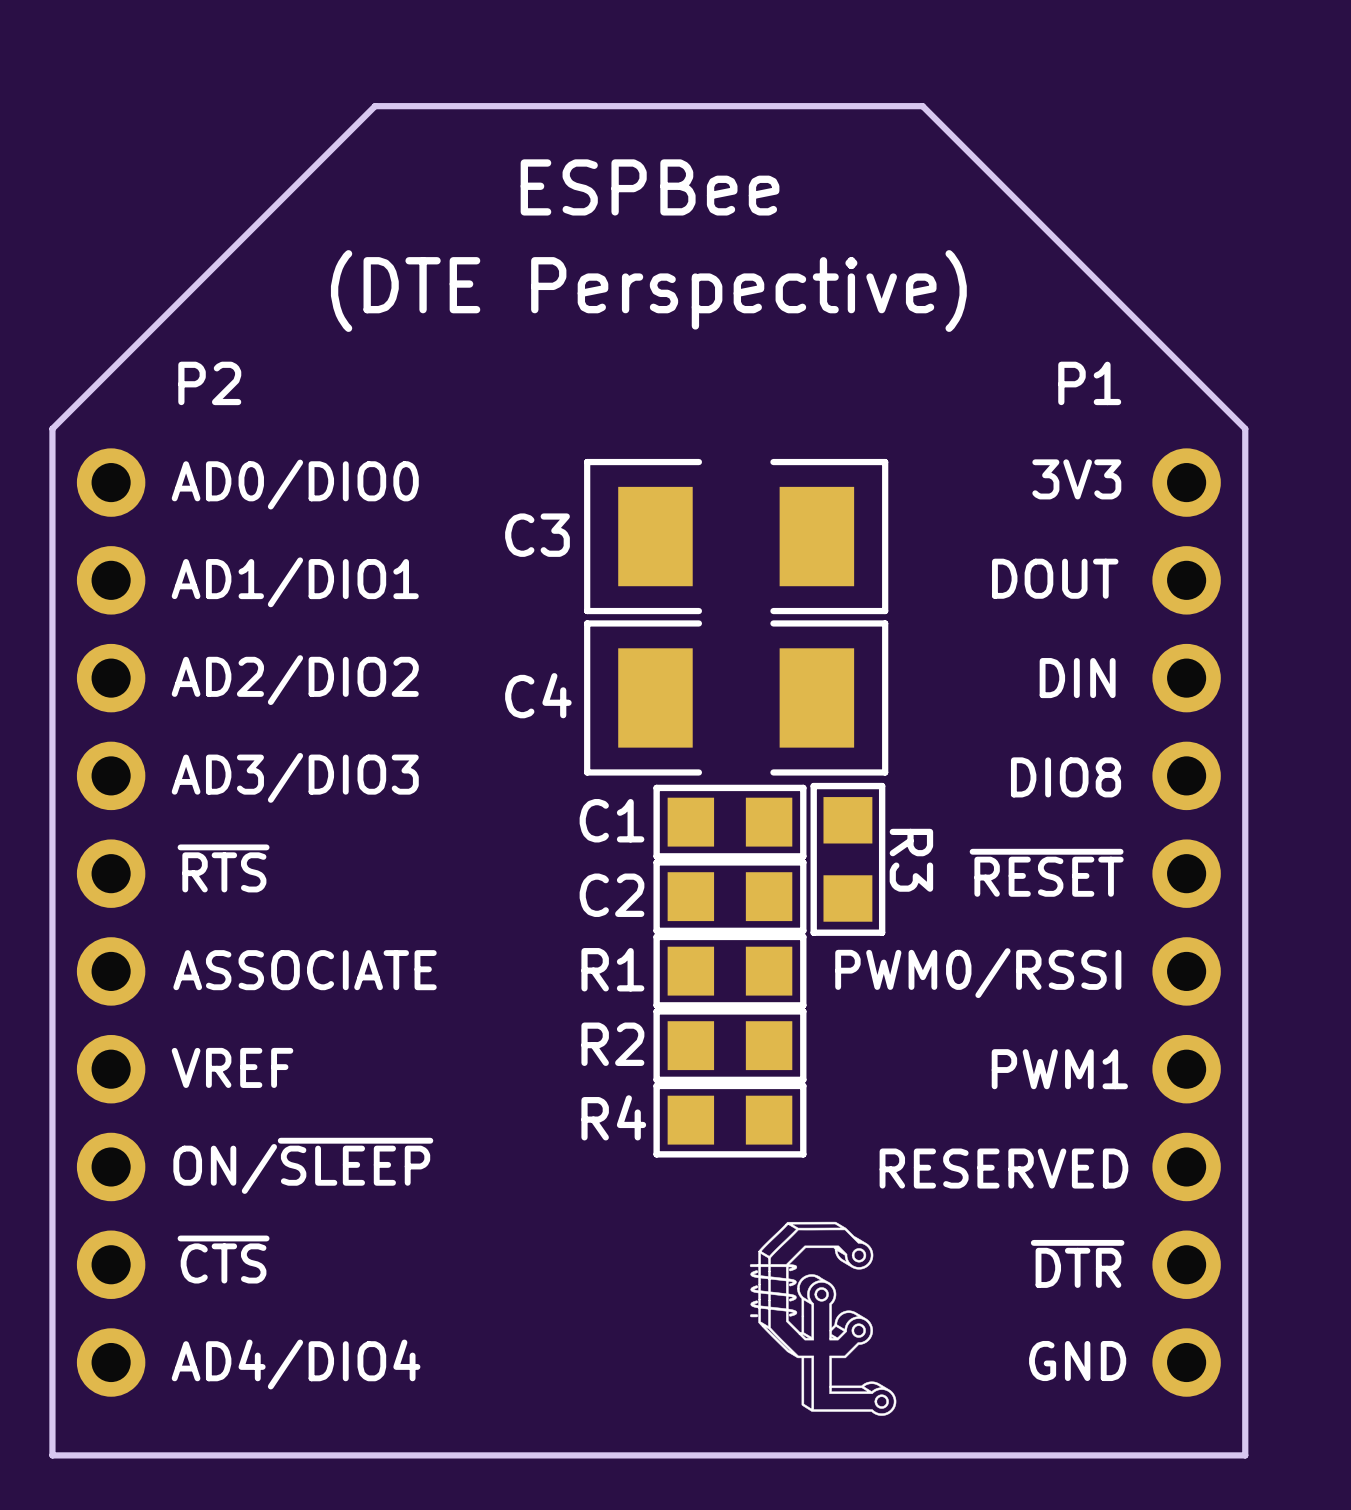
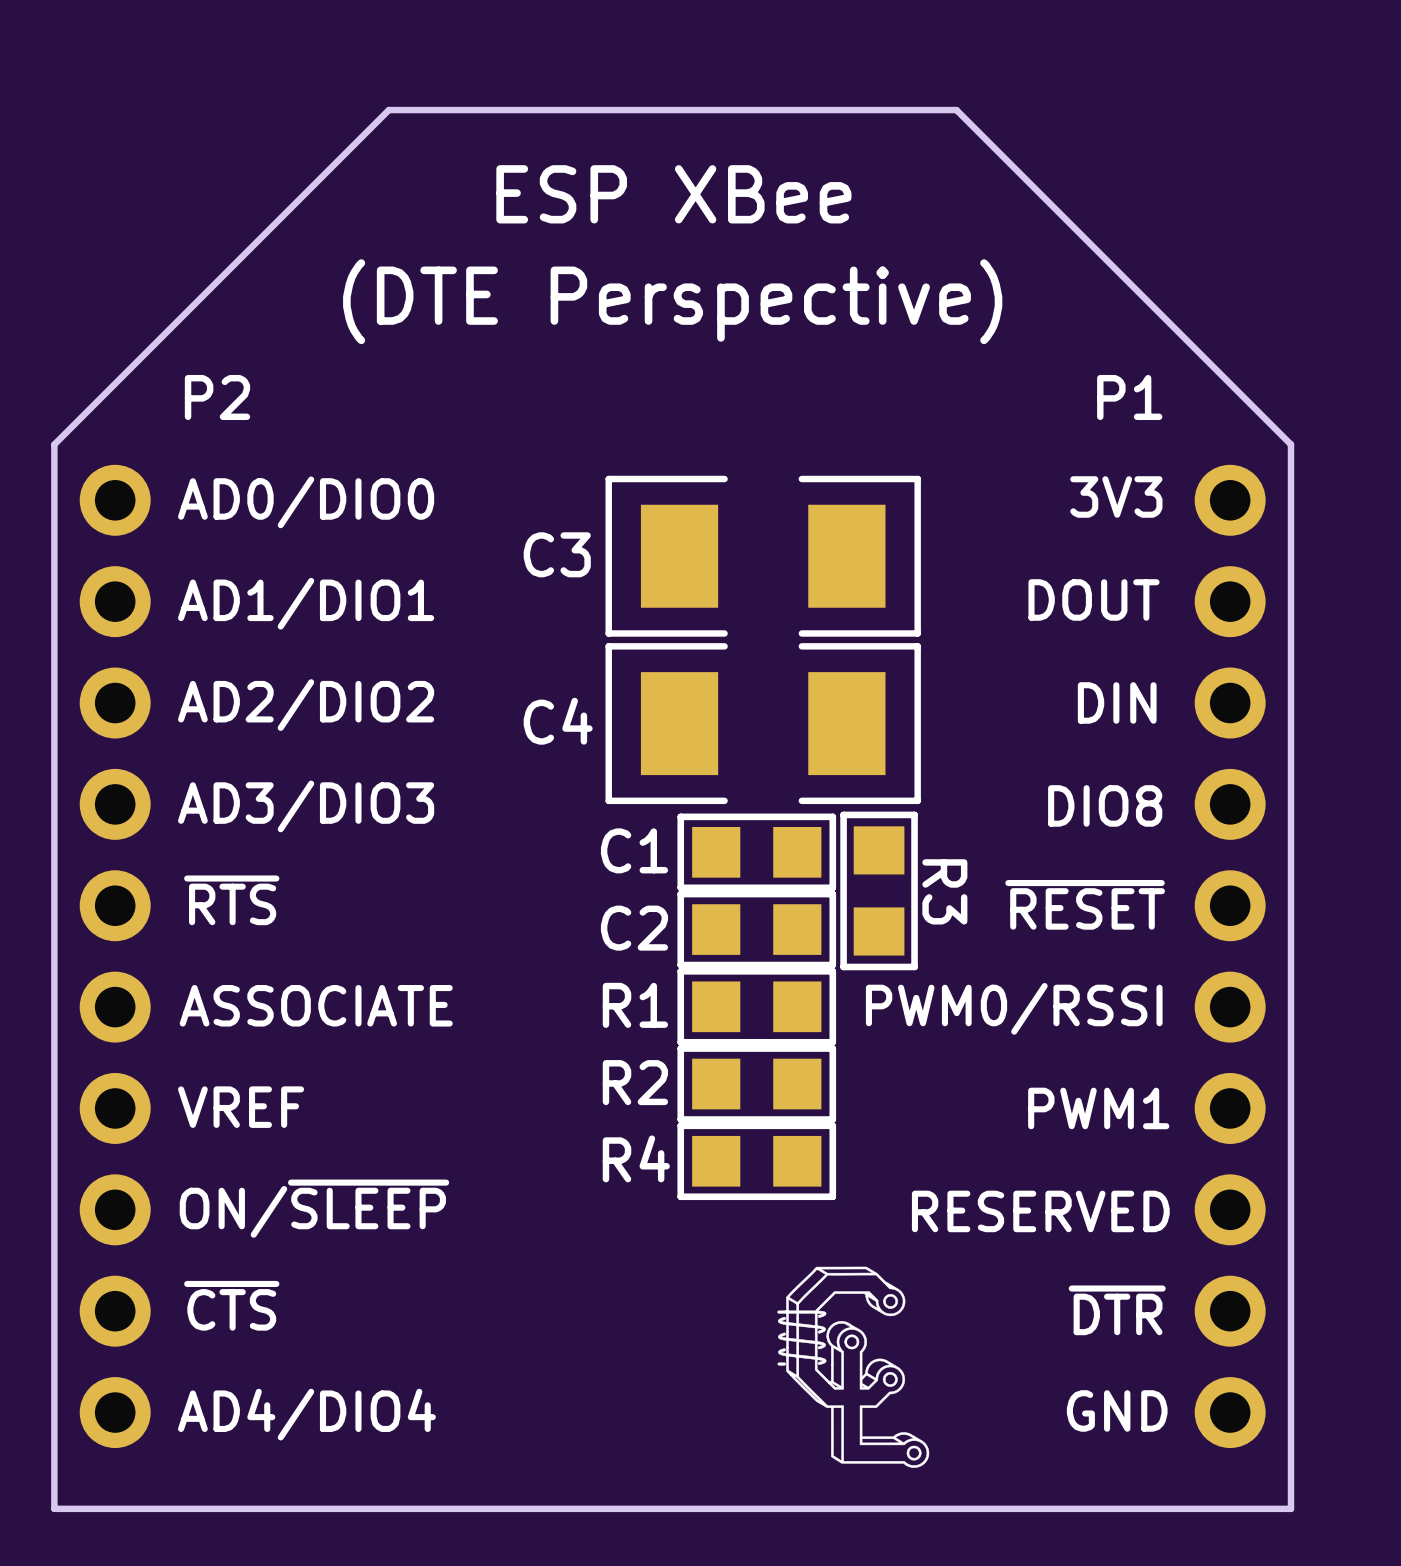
P1 text: ESPBee (650, 187) -> ESP XBee (673, 194)

